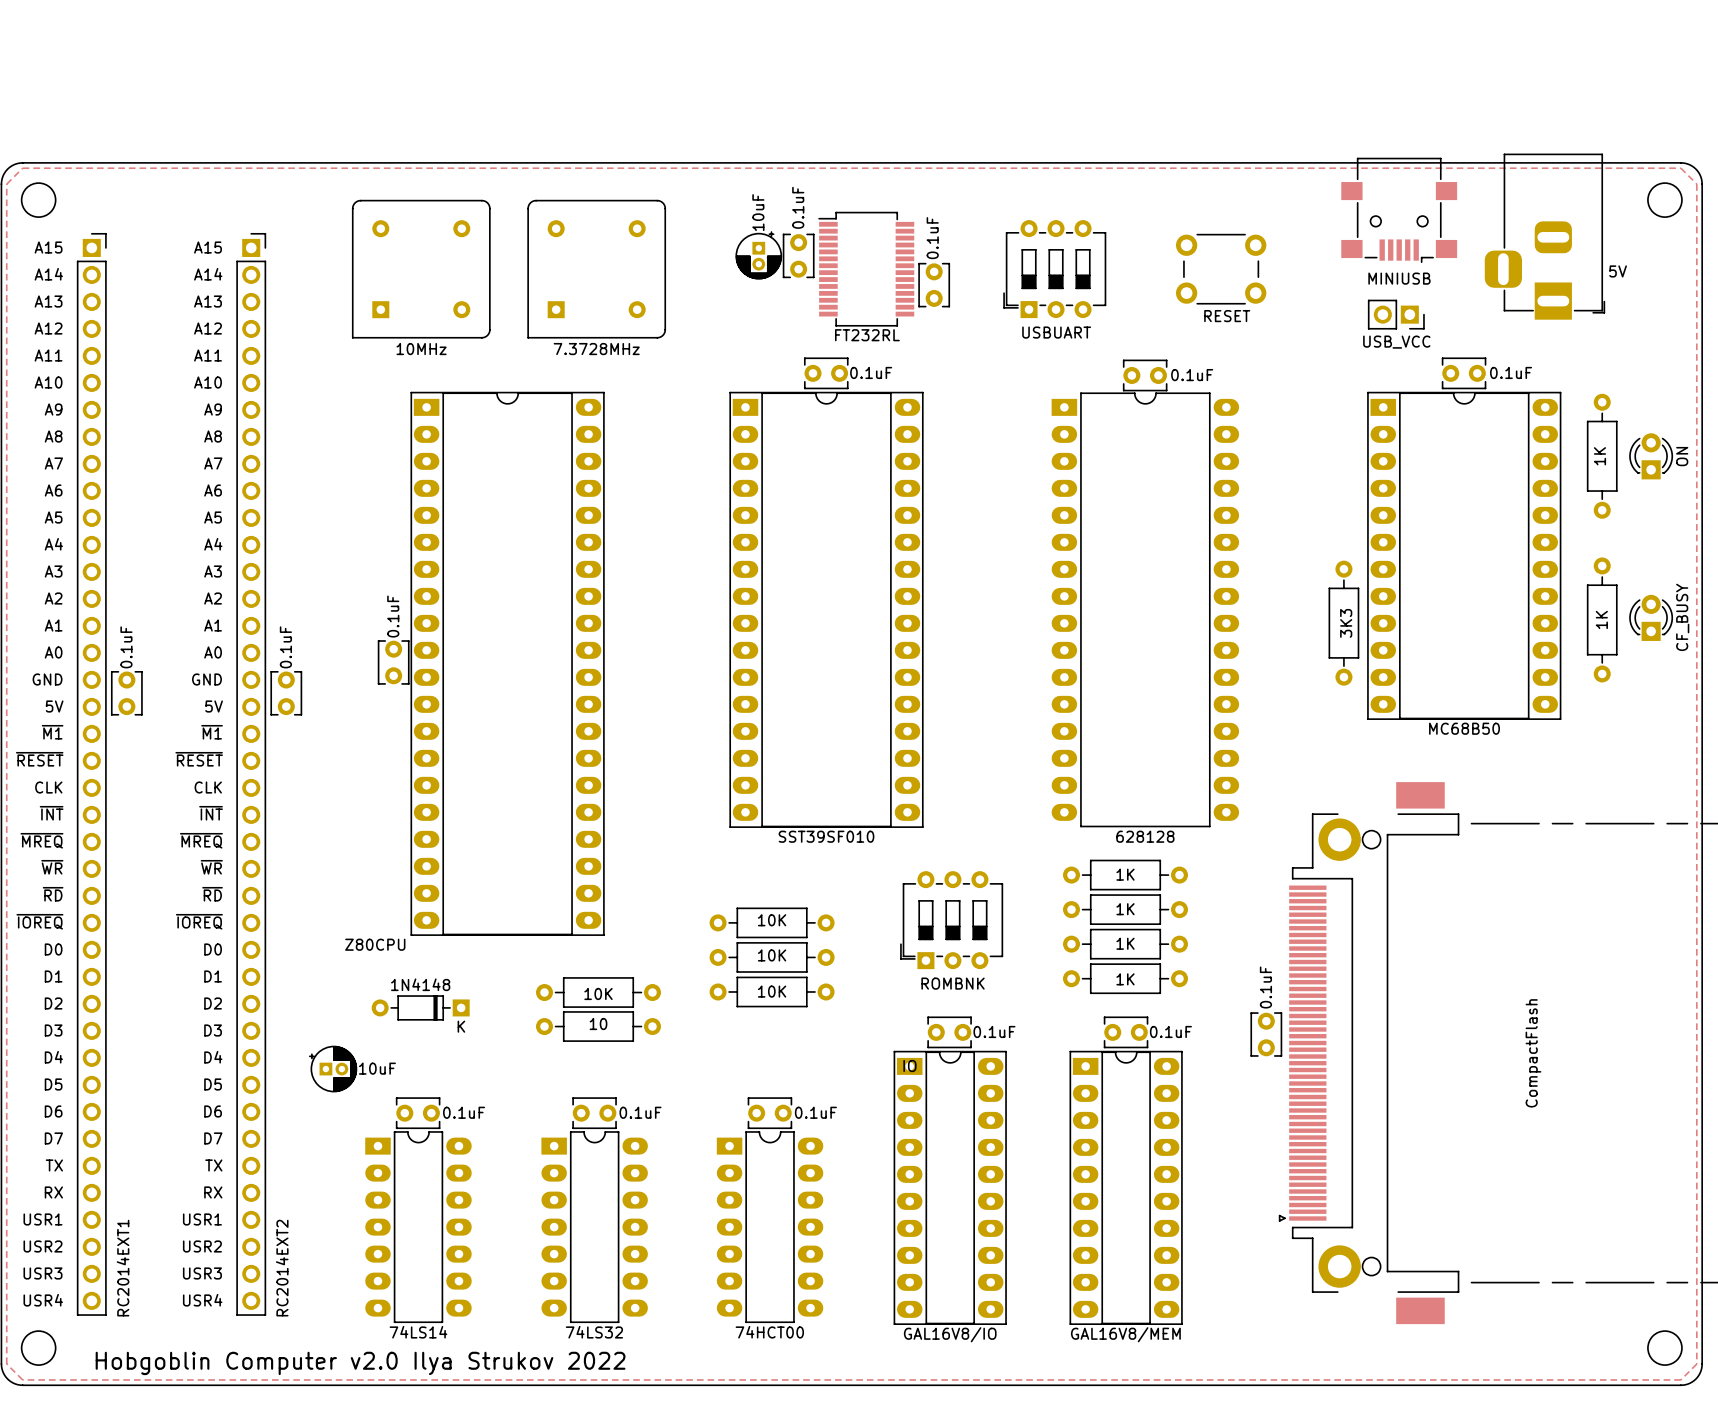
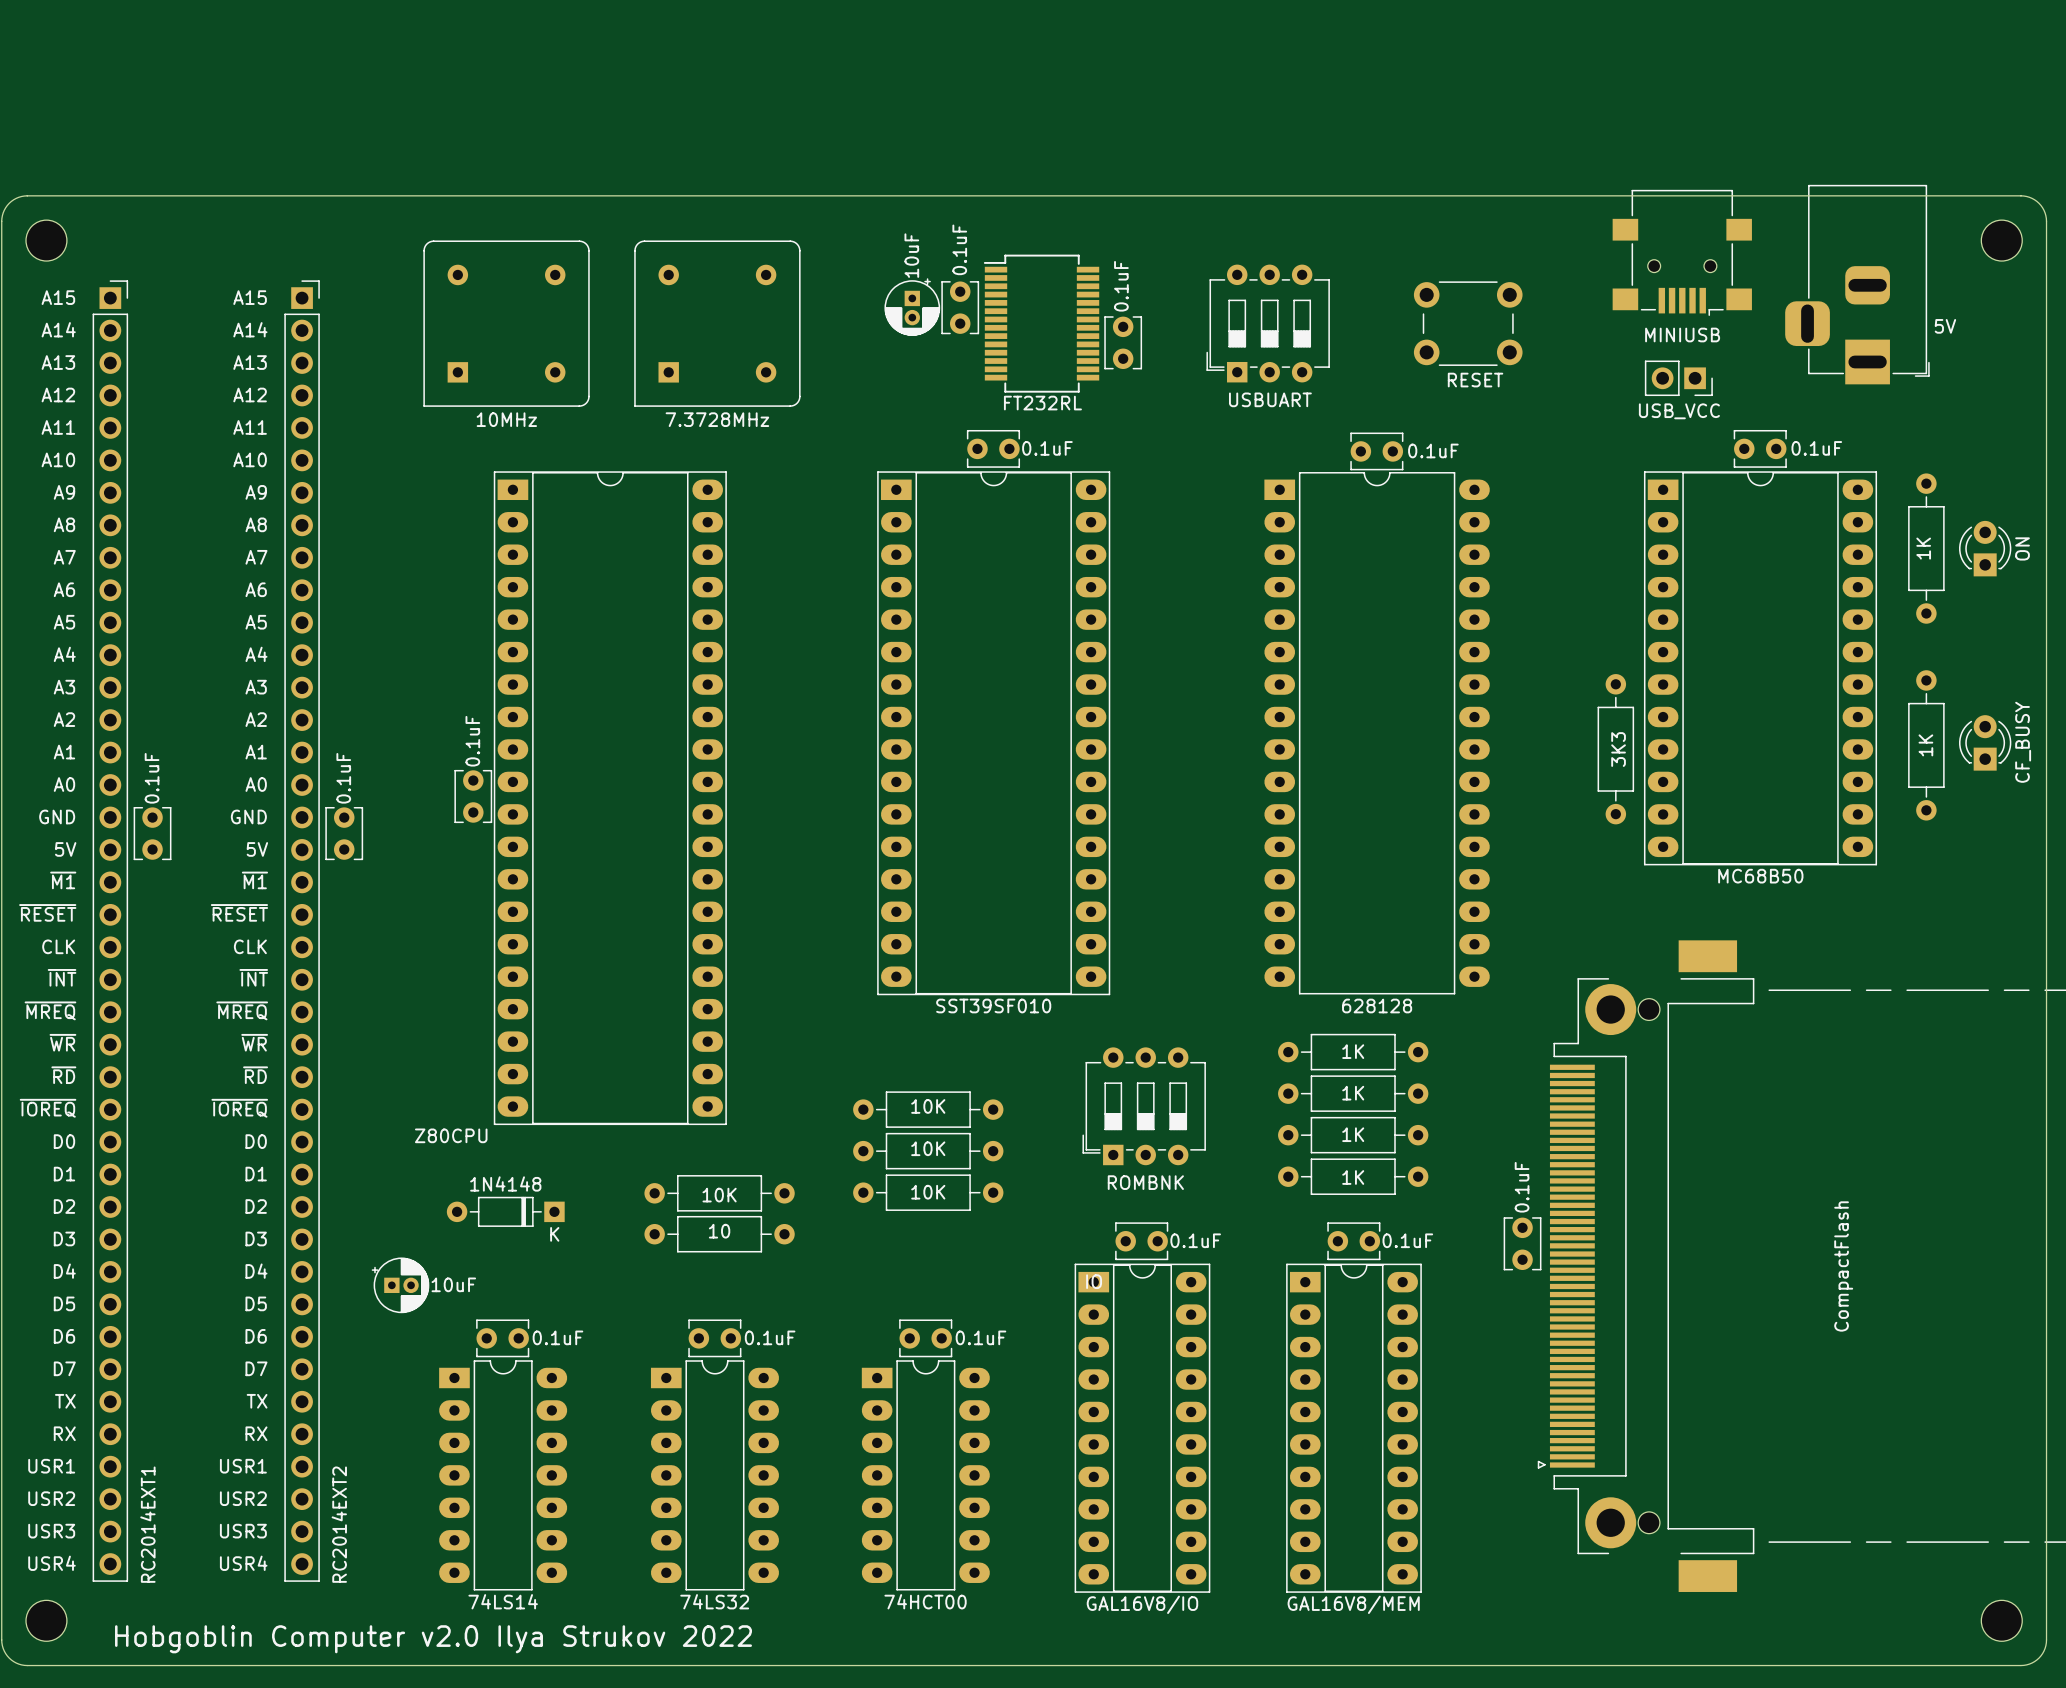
zone outline: (22, 168) (6, 184) (6, 1364) (22, 1379) (1680, 1379) (1696, 1364) (1696, 184) (1680, 168) (22, 168) -> none

